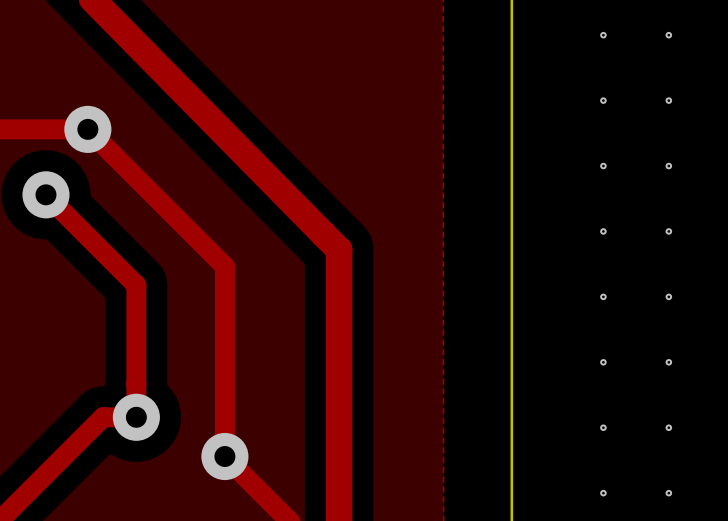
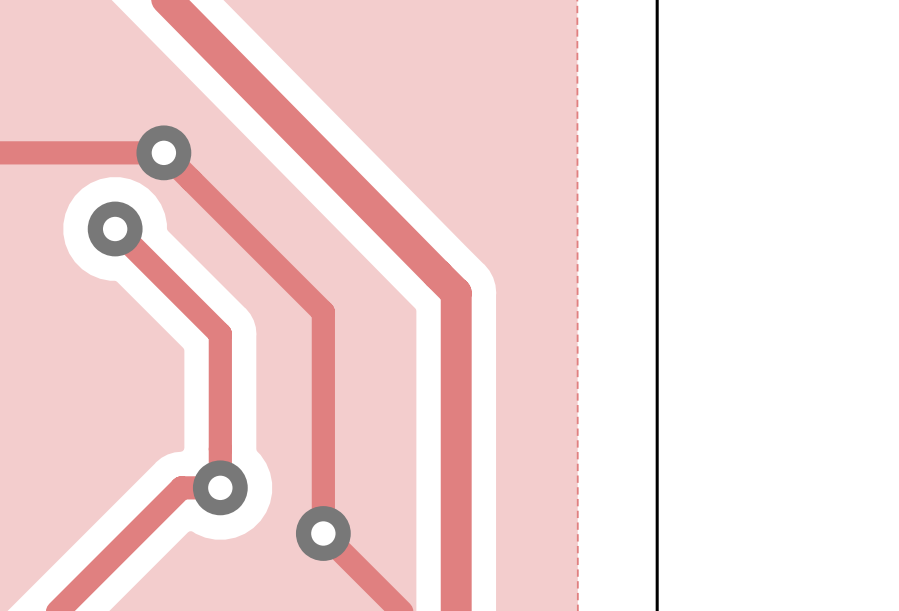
via: (603, 35) -> none
via: (668, 35) -> none
via: (603, 100) -> none
via: (668, 100) -> none
via: (603, 166) -> none
via: (668, 166) -> none
via: (603, 231) -> none
via: (668, 231) -> none
via: (603, 296) -> none
via: (668, 296) -> none
via: (603, 362) -> none
via: (668, 362) -> none
via: (603, 427) -> none
via: (668, 427) -> none
via: (603, 493) -> none
via: (668, 493) -> none

